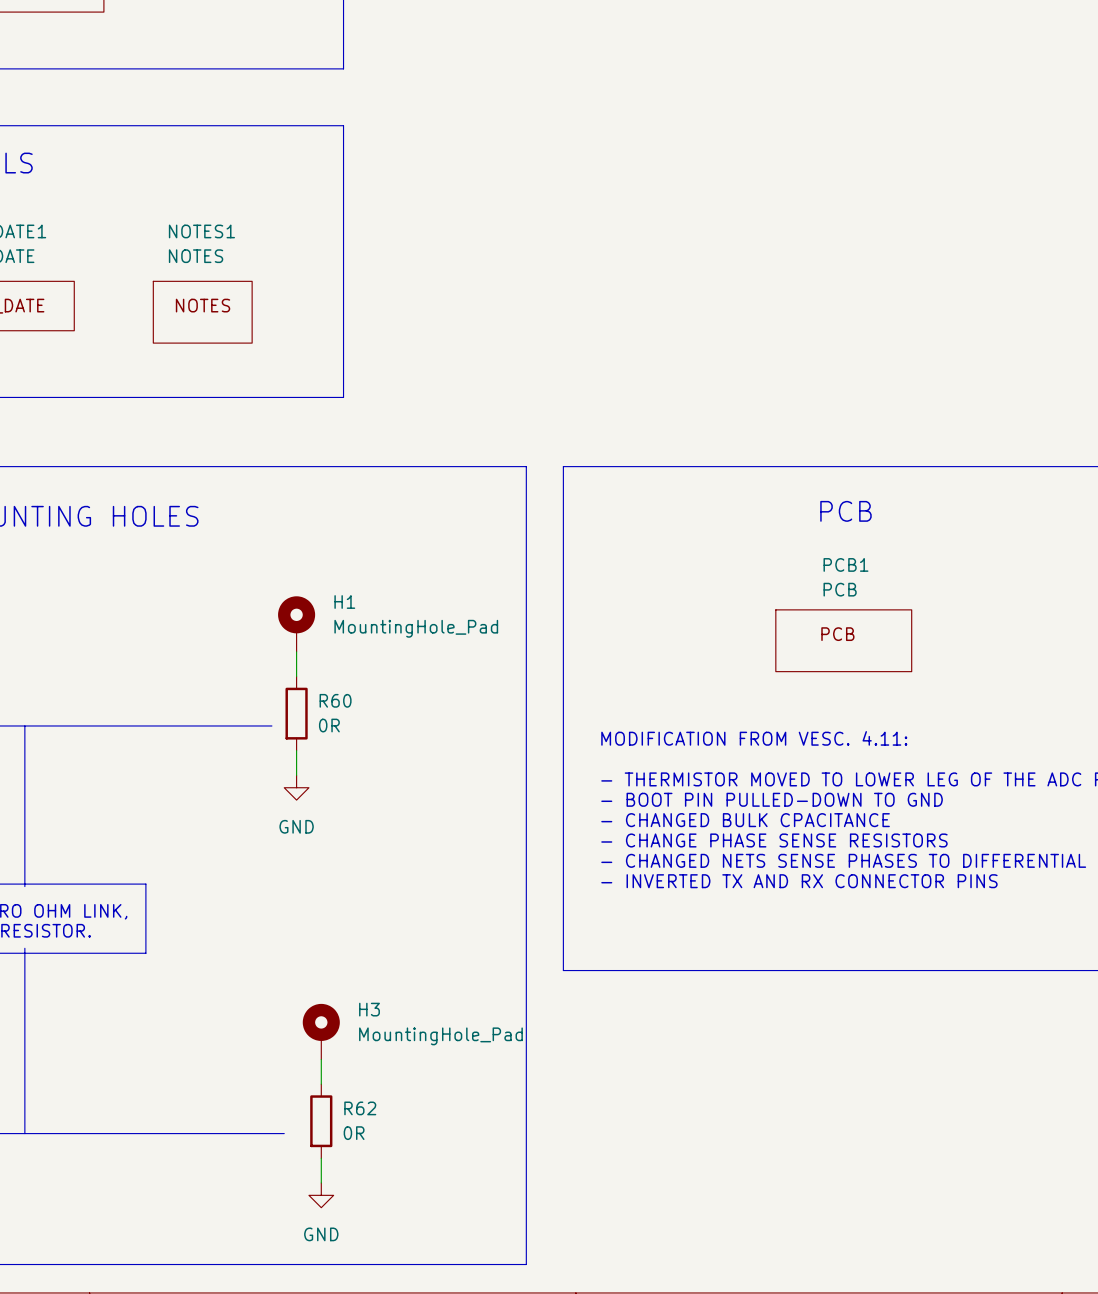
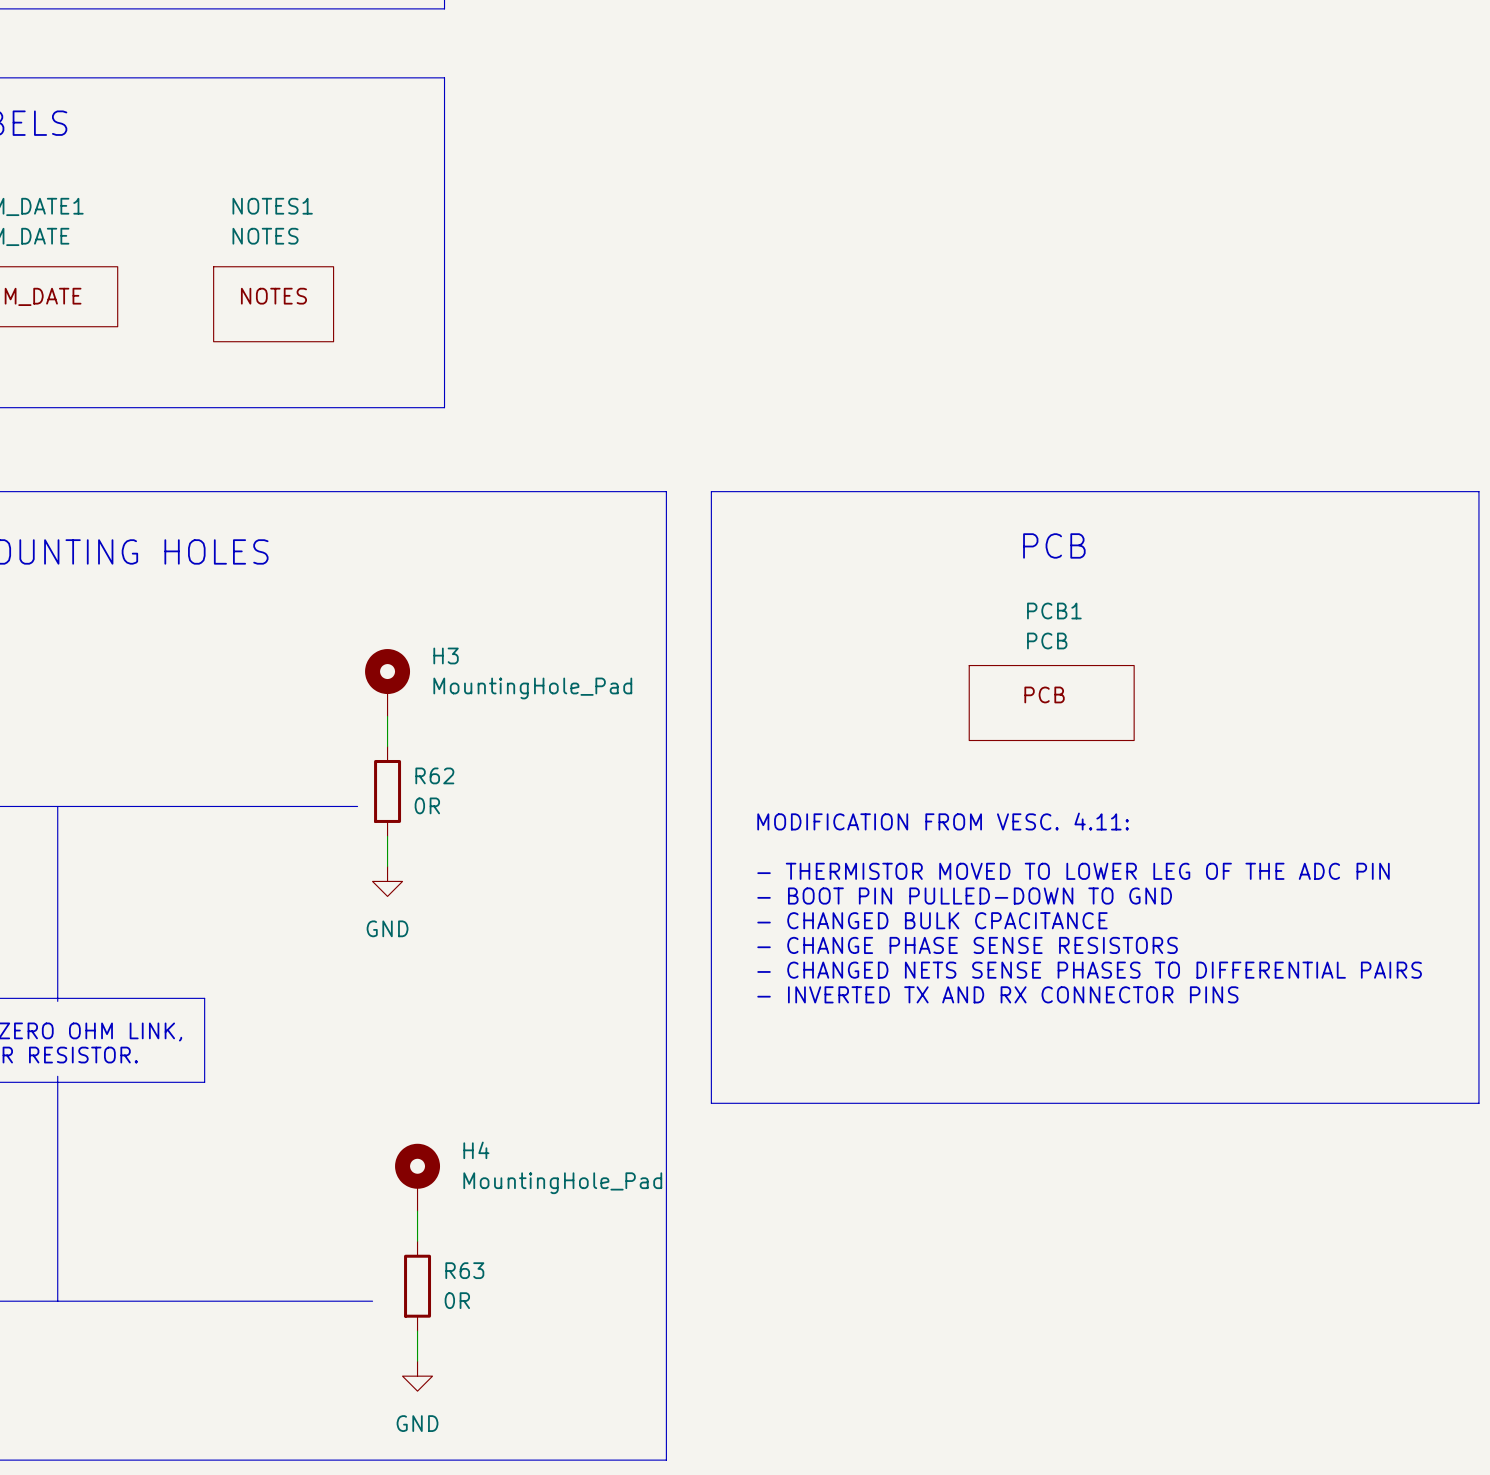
H1 name: H1 (344, 602) -> H3 (446, 655)
R60 name: R60 (335, 700) -> R62 (434, 775)
H3 name: H3 (369, 1009) -> H4 (476, 1150)
R62 name: R62 (360, 1108) -> R63 (464, 1270)

